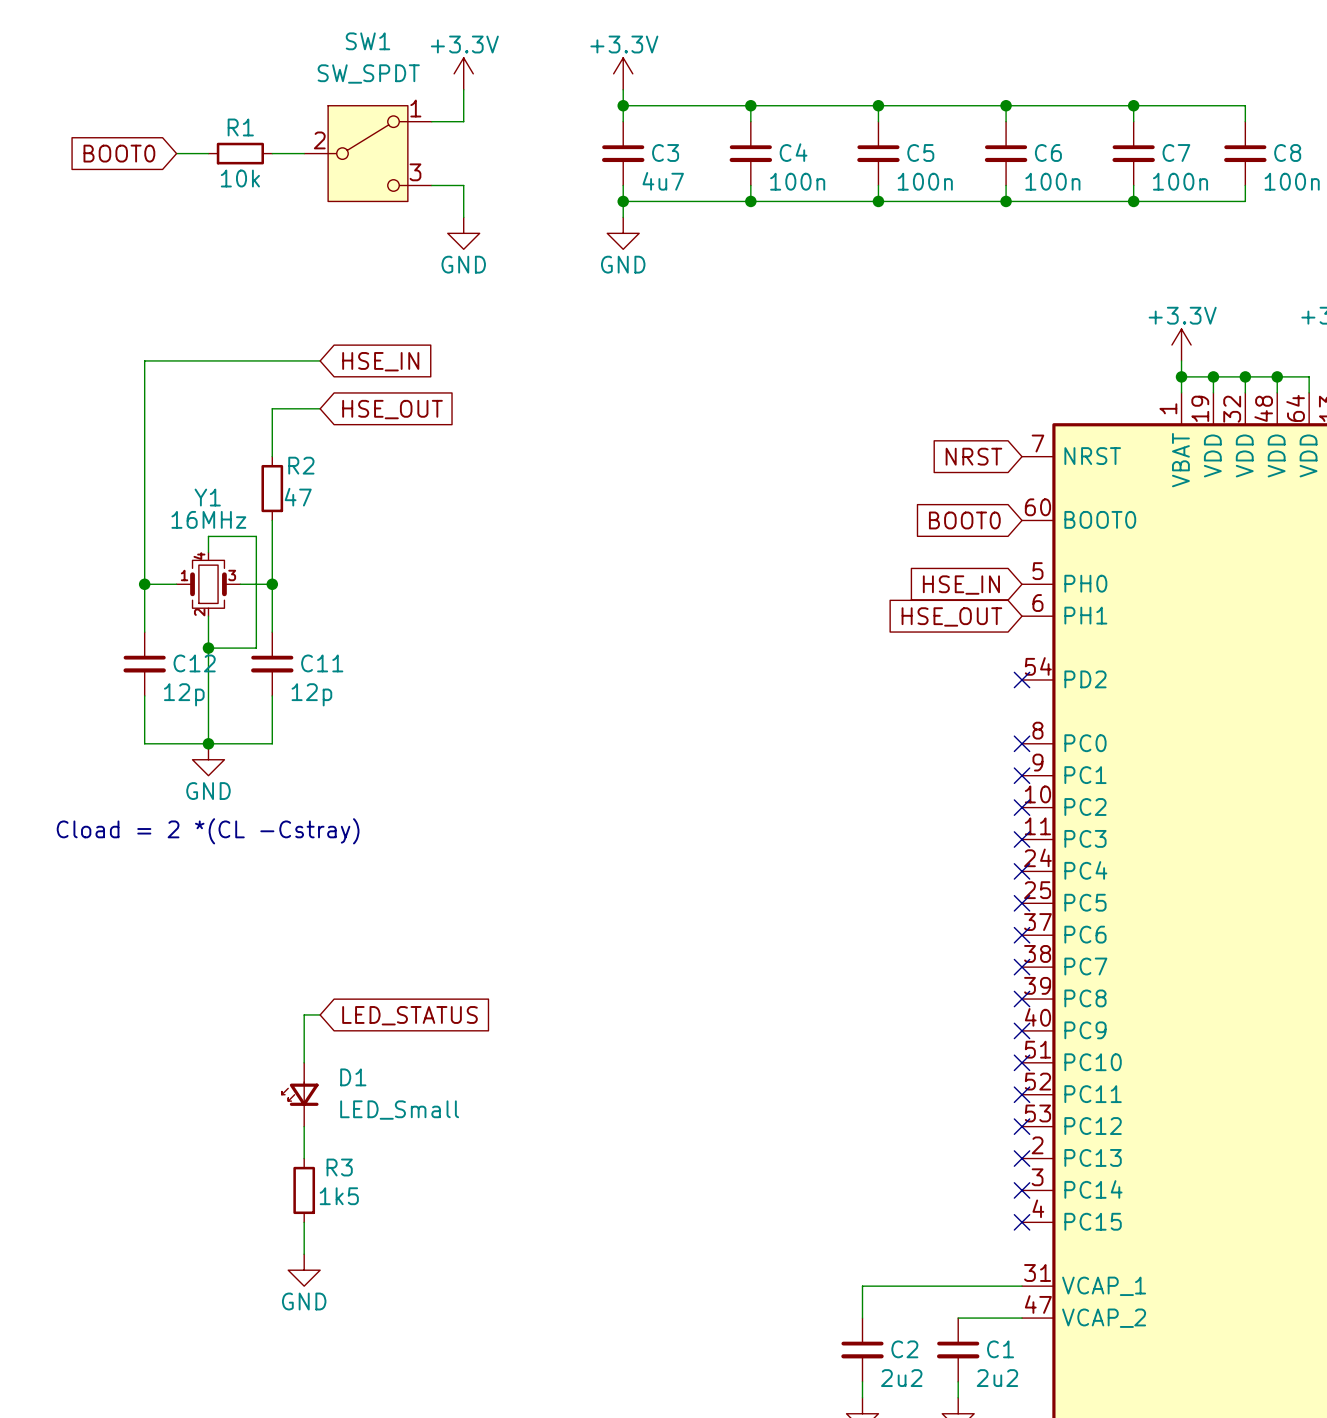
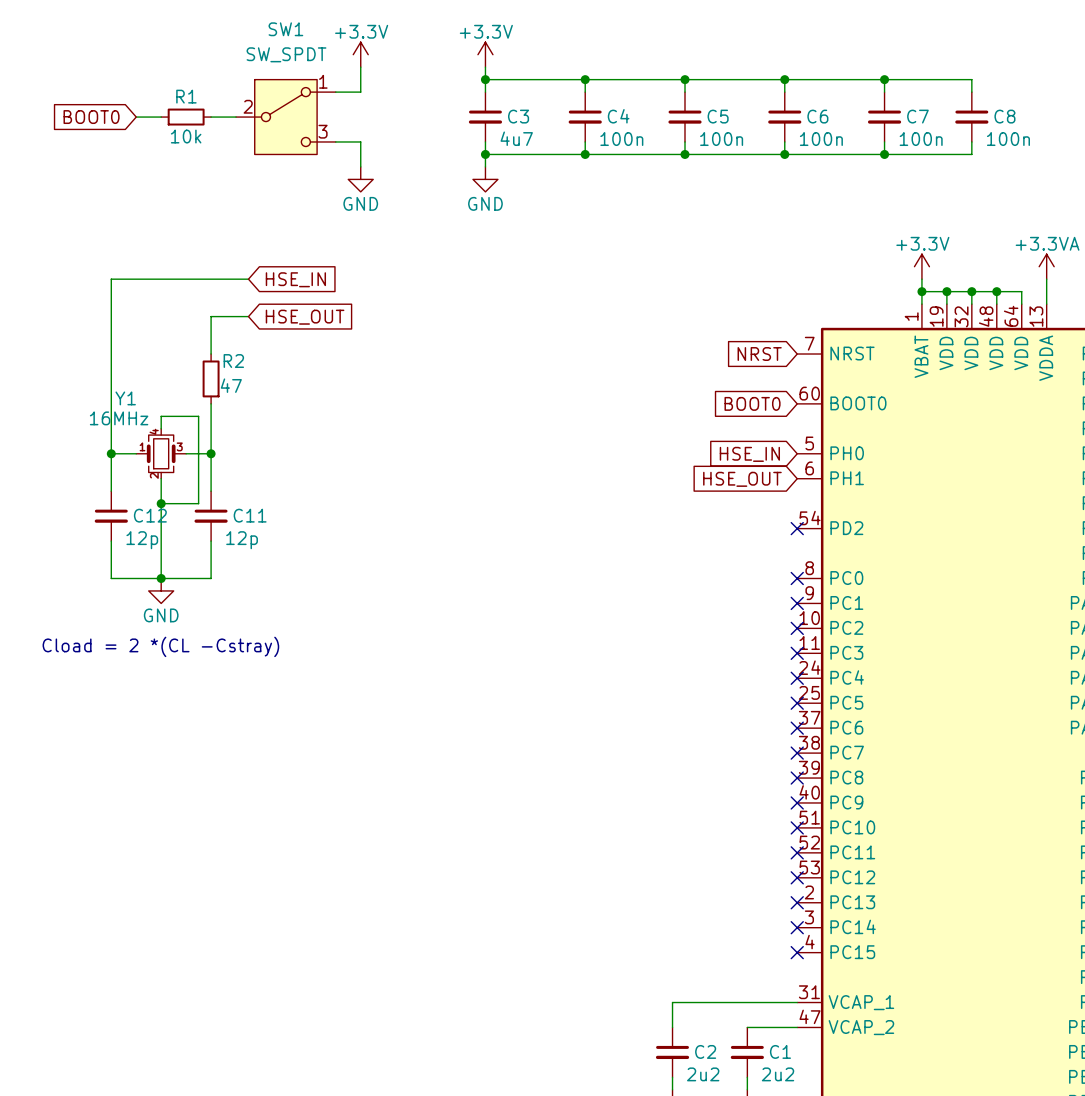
Y1 name position: Y1 (207, 497) -> Y1 (125, 398)
Y1 value position: 16MHz (208, 519) -> 16MHz (119, 418)
wire: (320, 1014) (304, 1014) (304, 1062) -> none
global label: LED_STATUS (409, 1015) -> none
D1: LED_Small (300, 1094) -> none
wire: (304, 1126) (304, 1158) -> none
R3: 1k5 (304, 1190) -> none
wire: (304, 1222) (304, 1254) -> none
power symbol: GND (304, 1270) -> none

